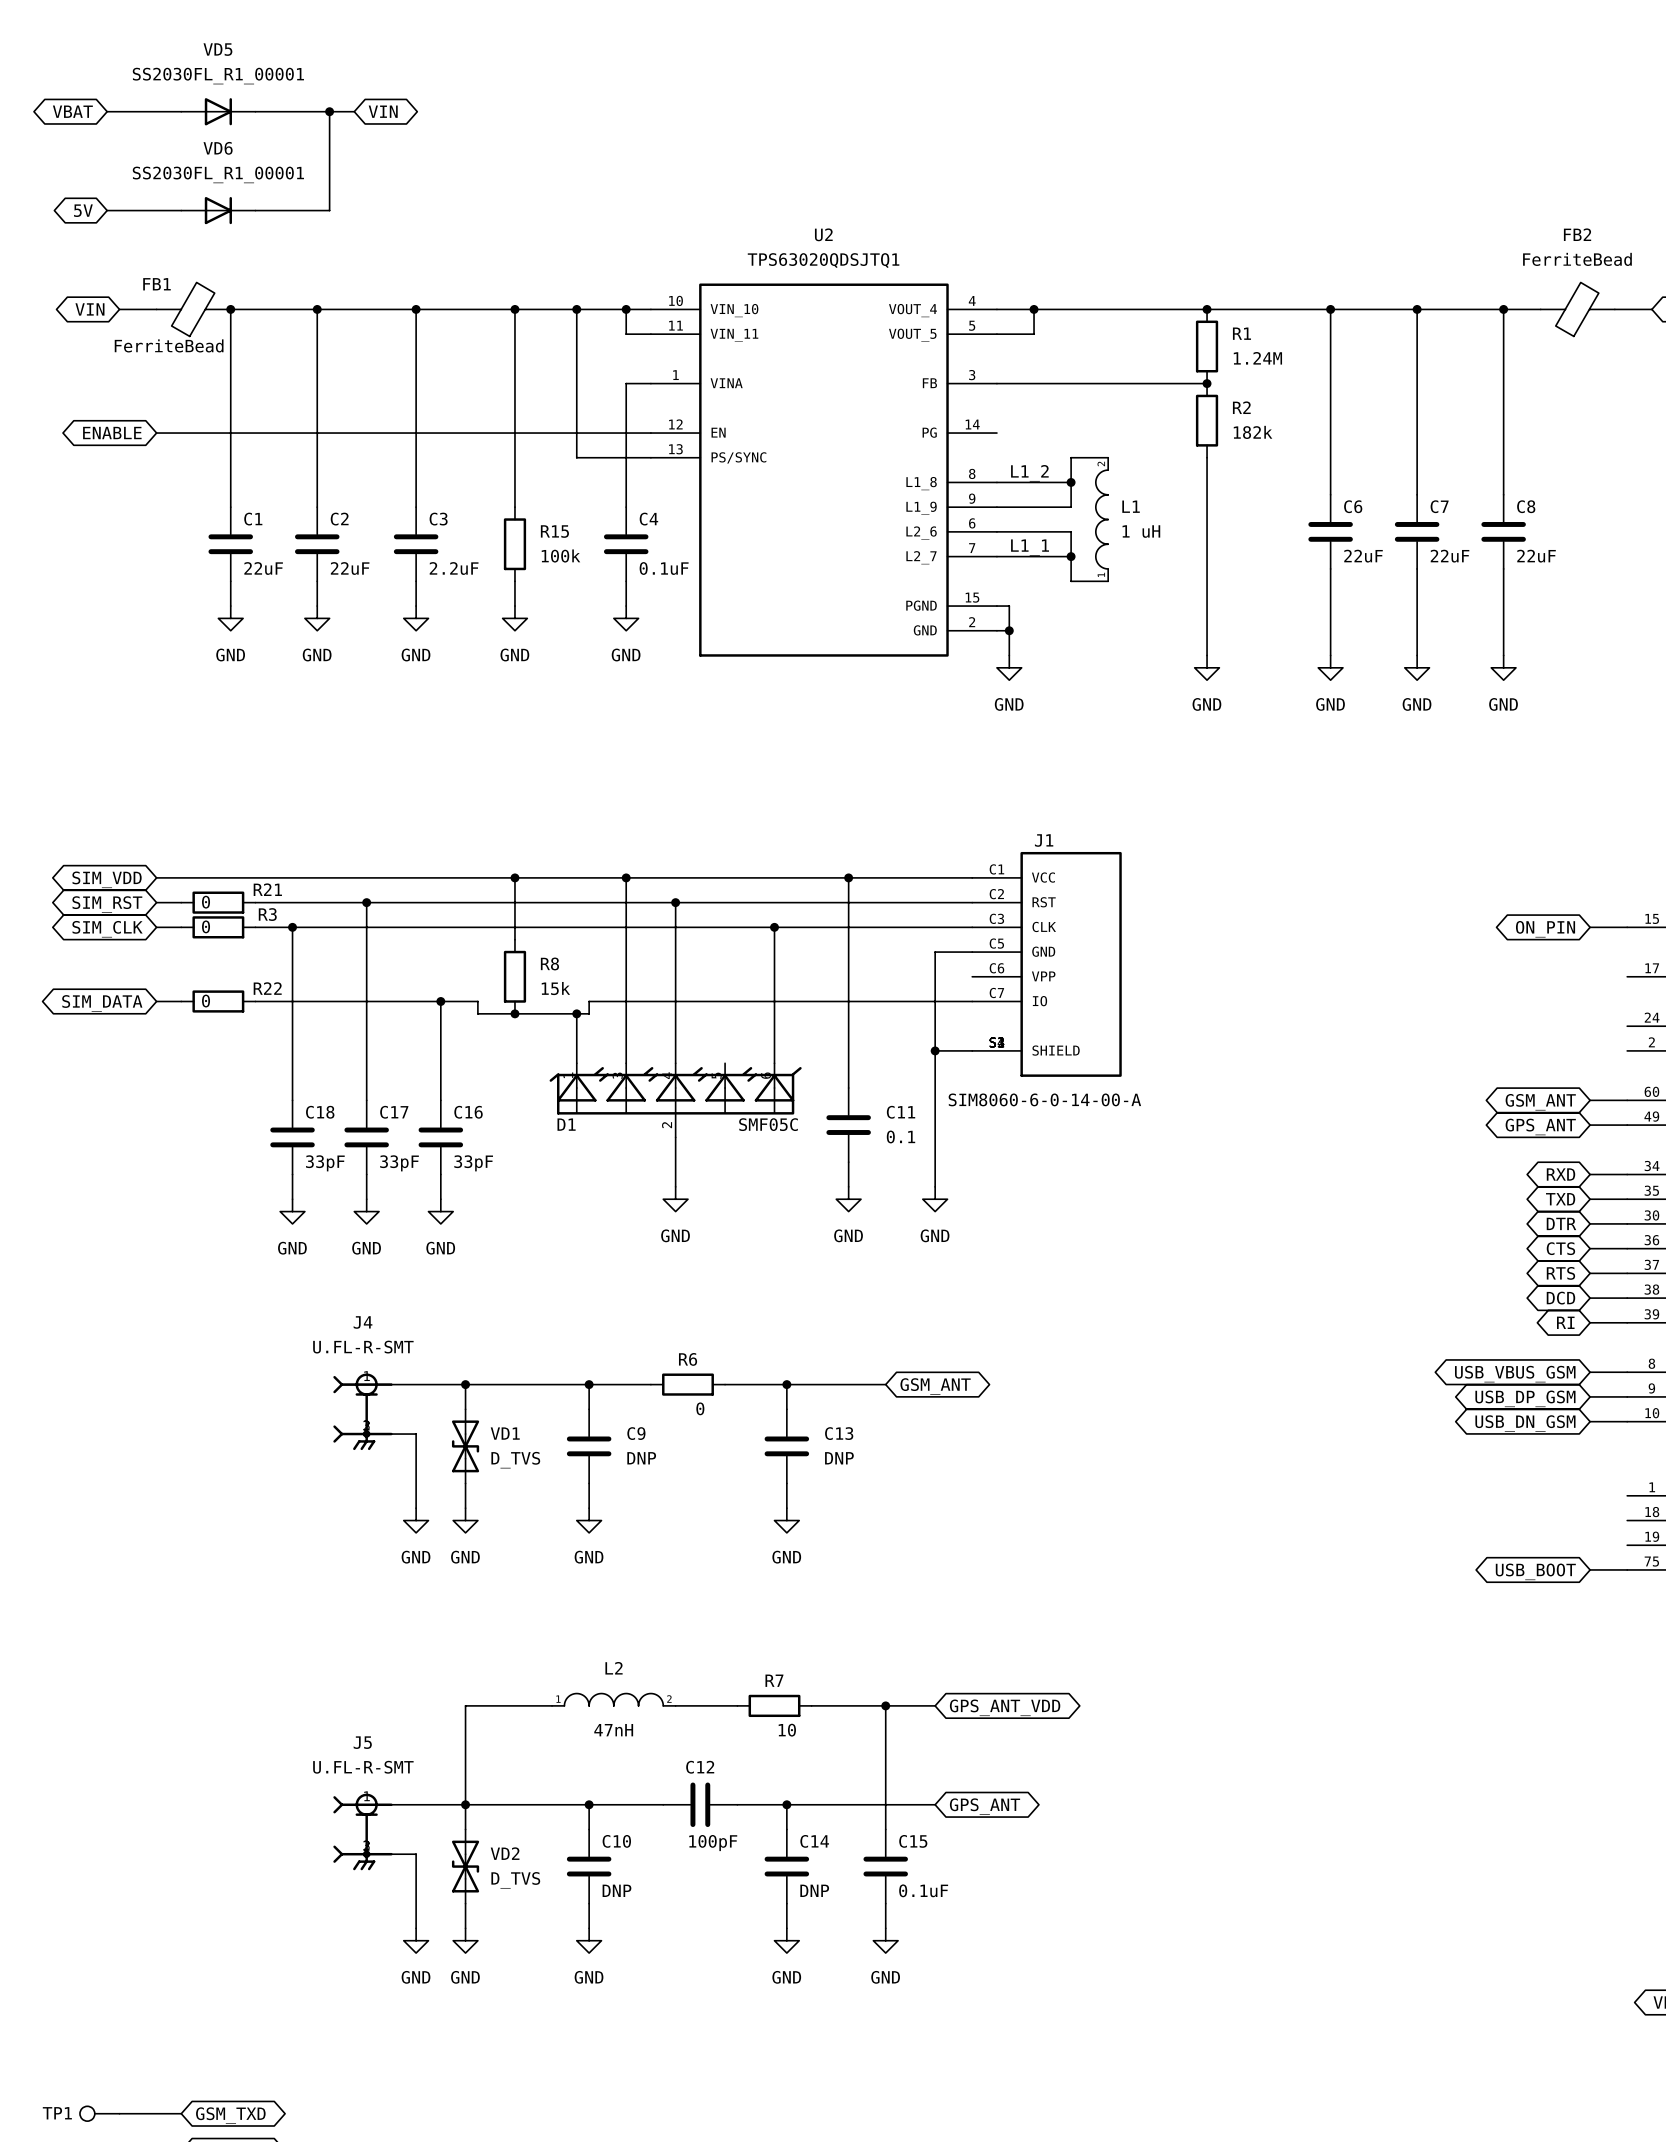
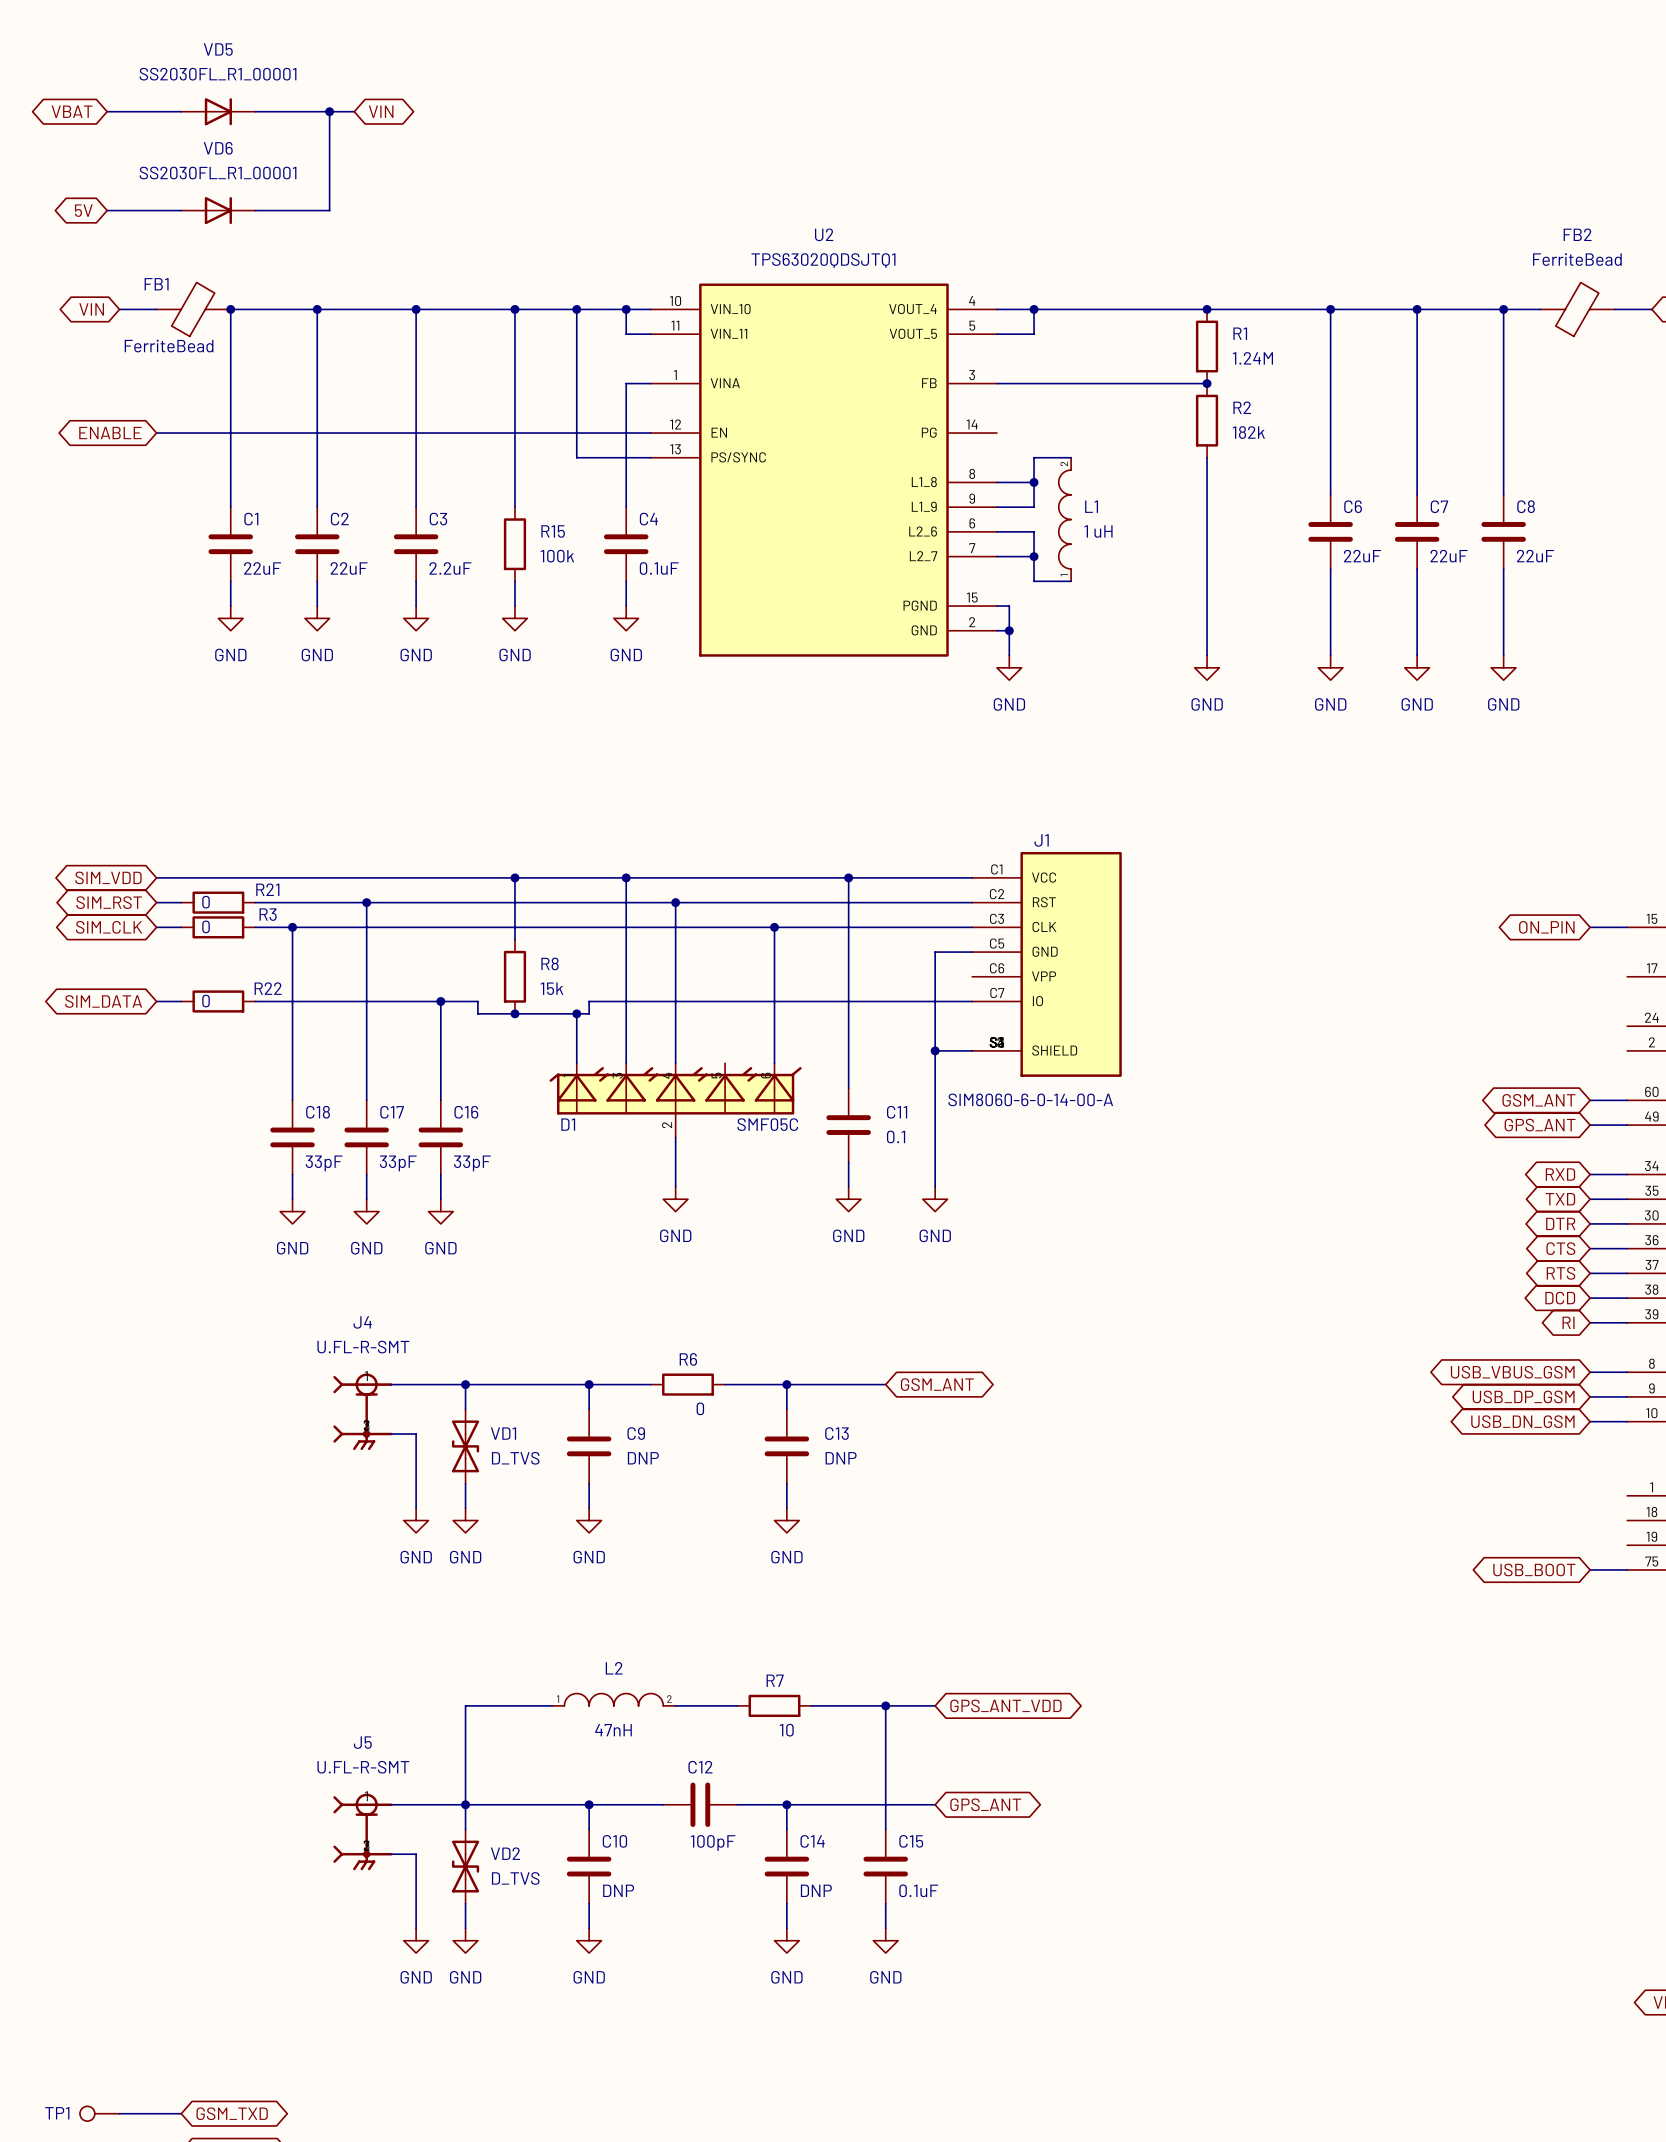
wire: (1108, 457) (1071, 457) (1071, 507) (1034, 507) -> (1071, 457) (1034, 457) (1034, 507)
label: L1_2 (1029, 473) -> none
wire: (1034, 482) (1071, 482) -> none
junction position: (1071, 482) -> (1034, 482)
L1 position: (1101, 519) -> (1064, 519)
wire: (1034, 531) (1071, 531) (1071, 581) (1108, 581) -> (1034, 531) (1034, 581) (1071, 581)
label: L1_1 (1030, 547) -> none
wire: (1034, 556) (1071, 556) -> none
junction position: (1071, 556) -> (1034, 556)

